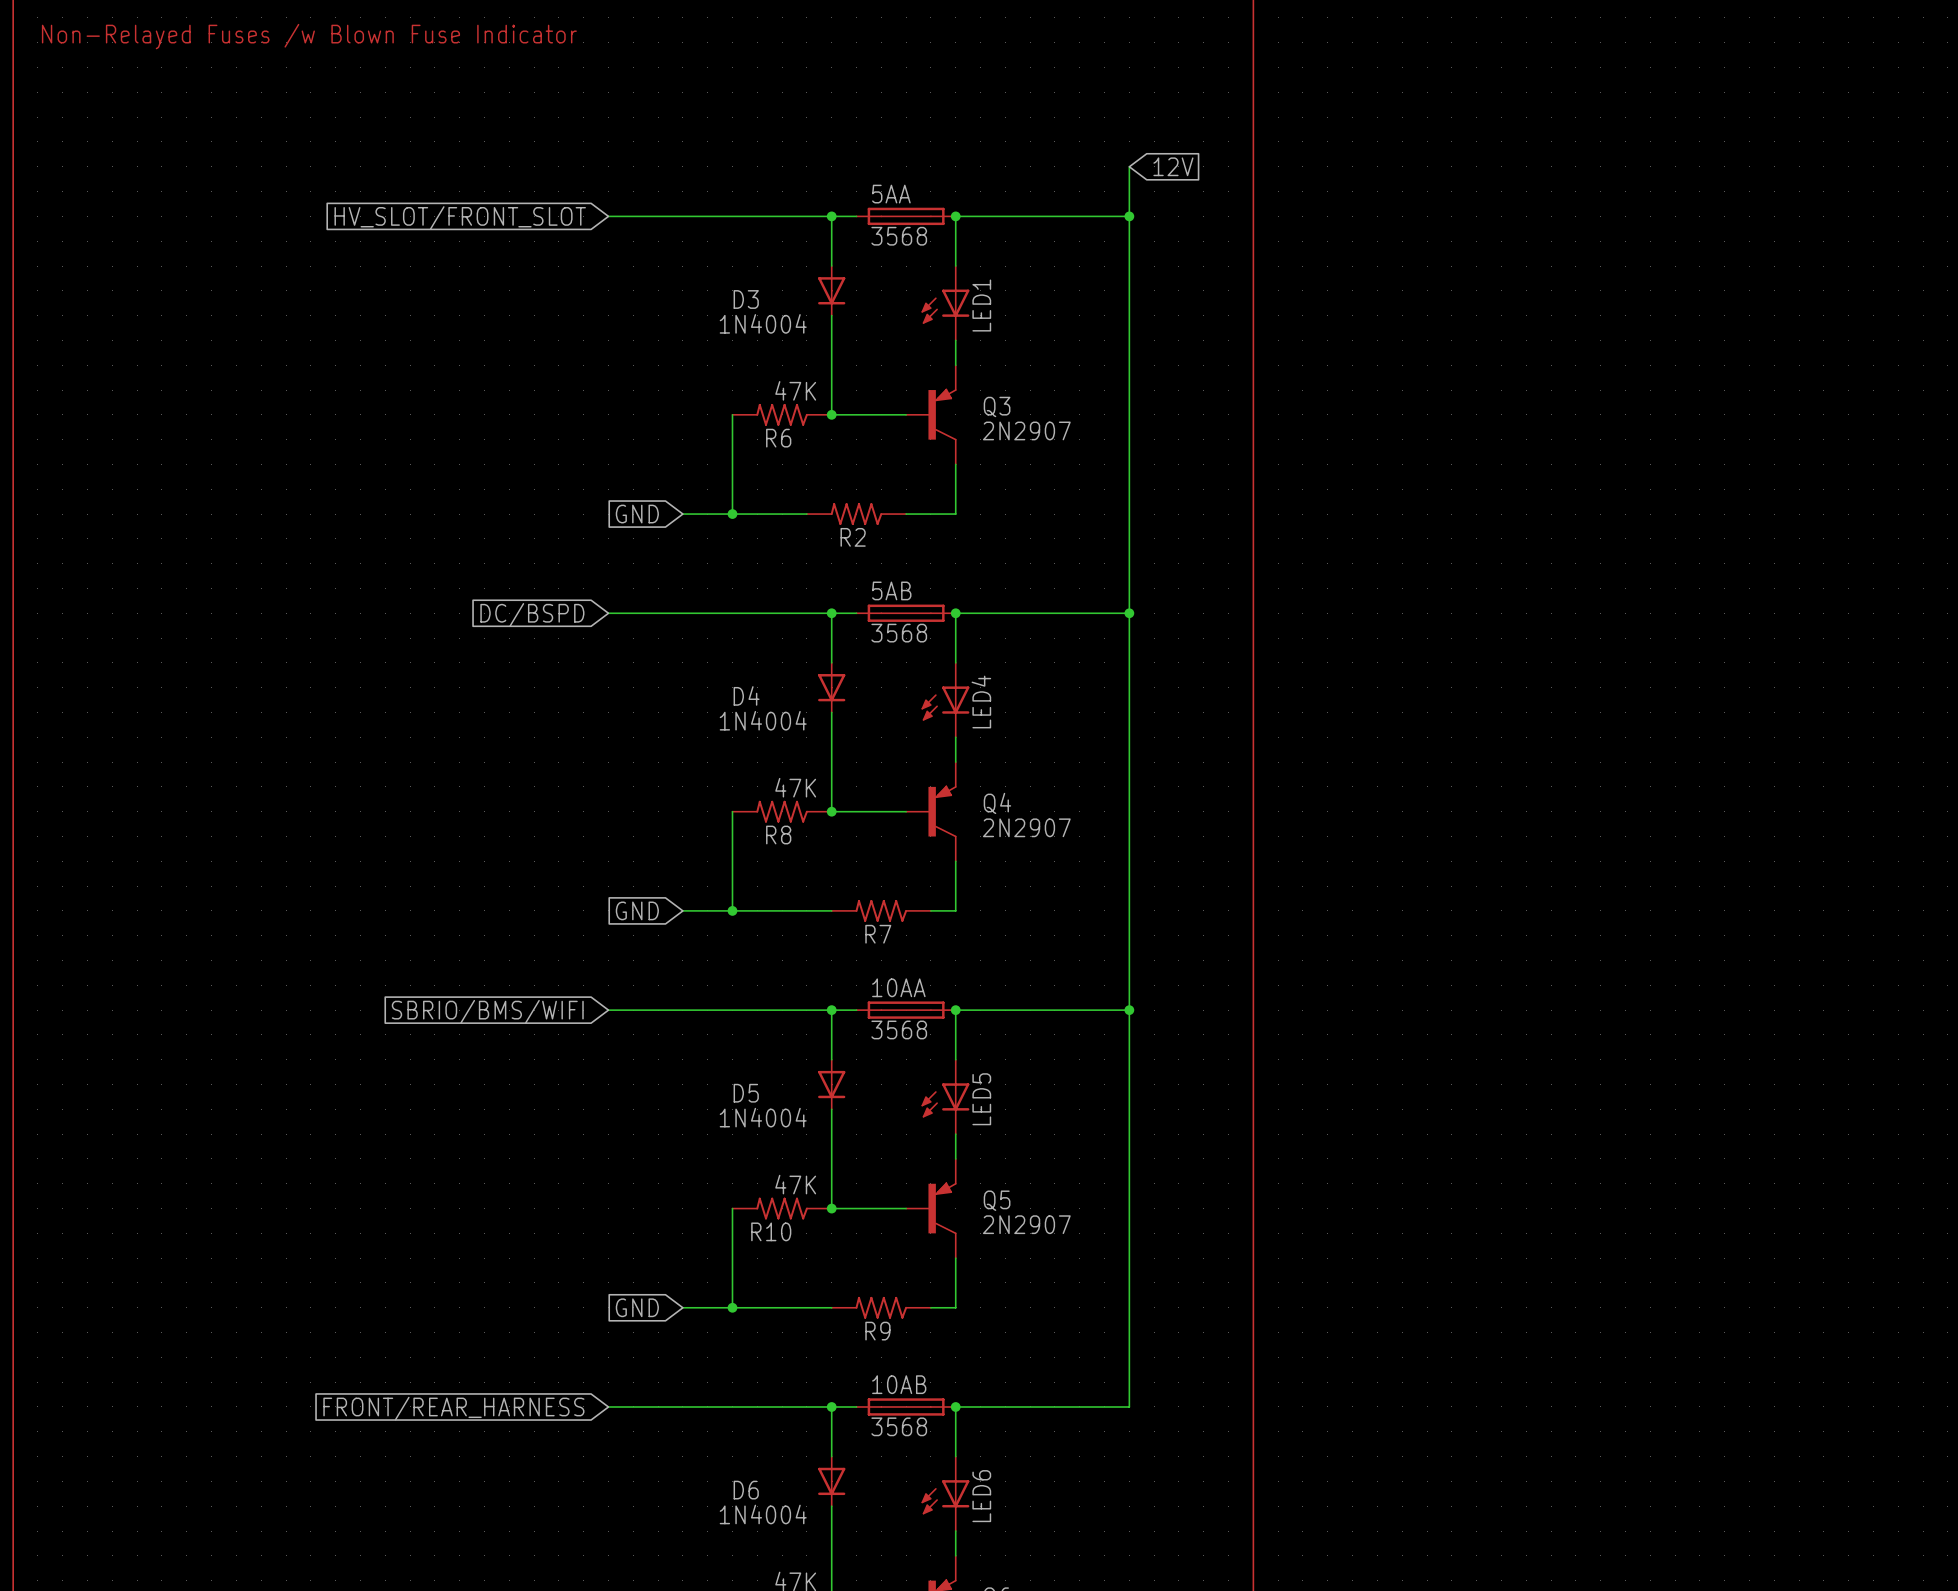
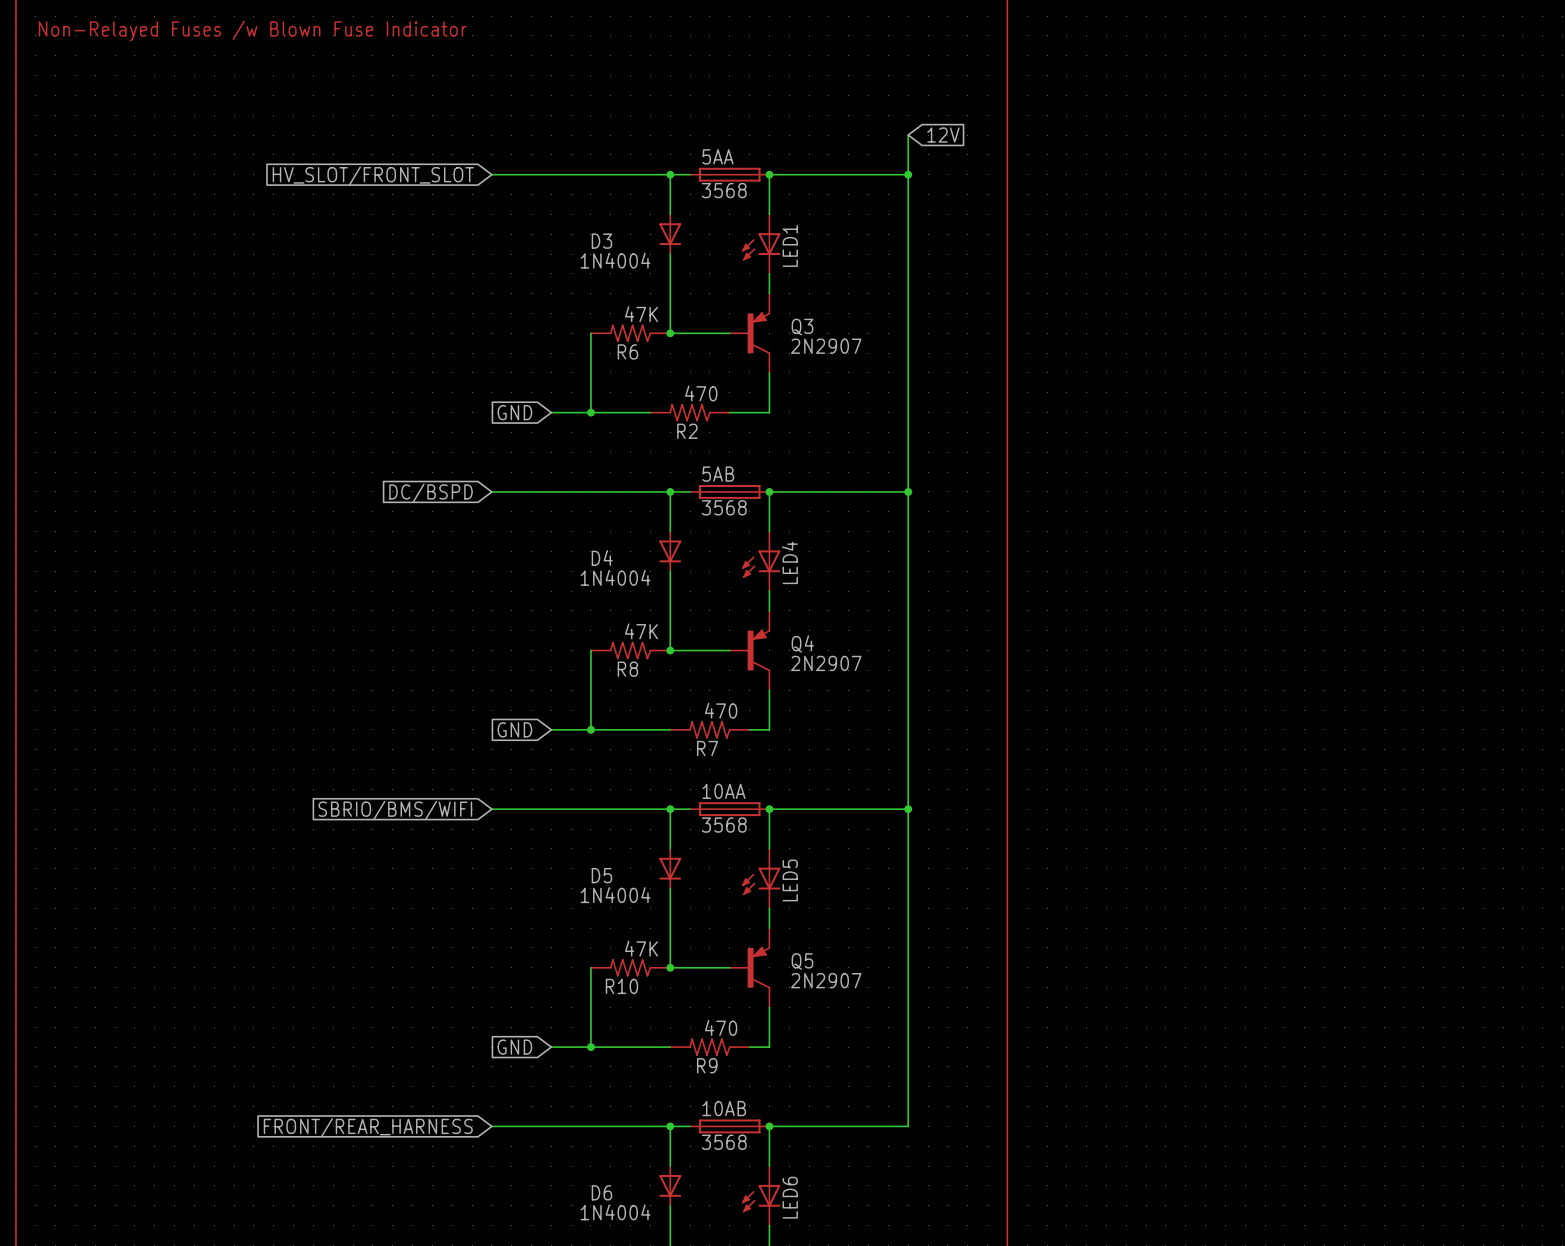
R2 value: none -> 470 (701, 393)
R7 value: none -> 470 (721, 710)
R9 value: none -> 470 (721, 1027)

